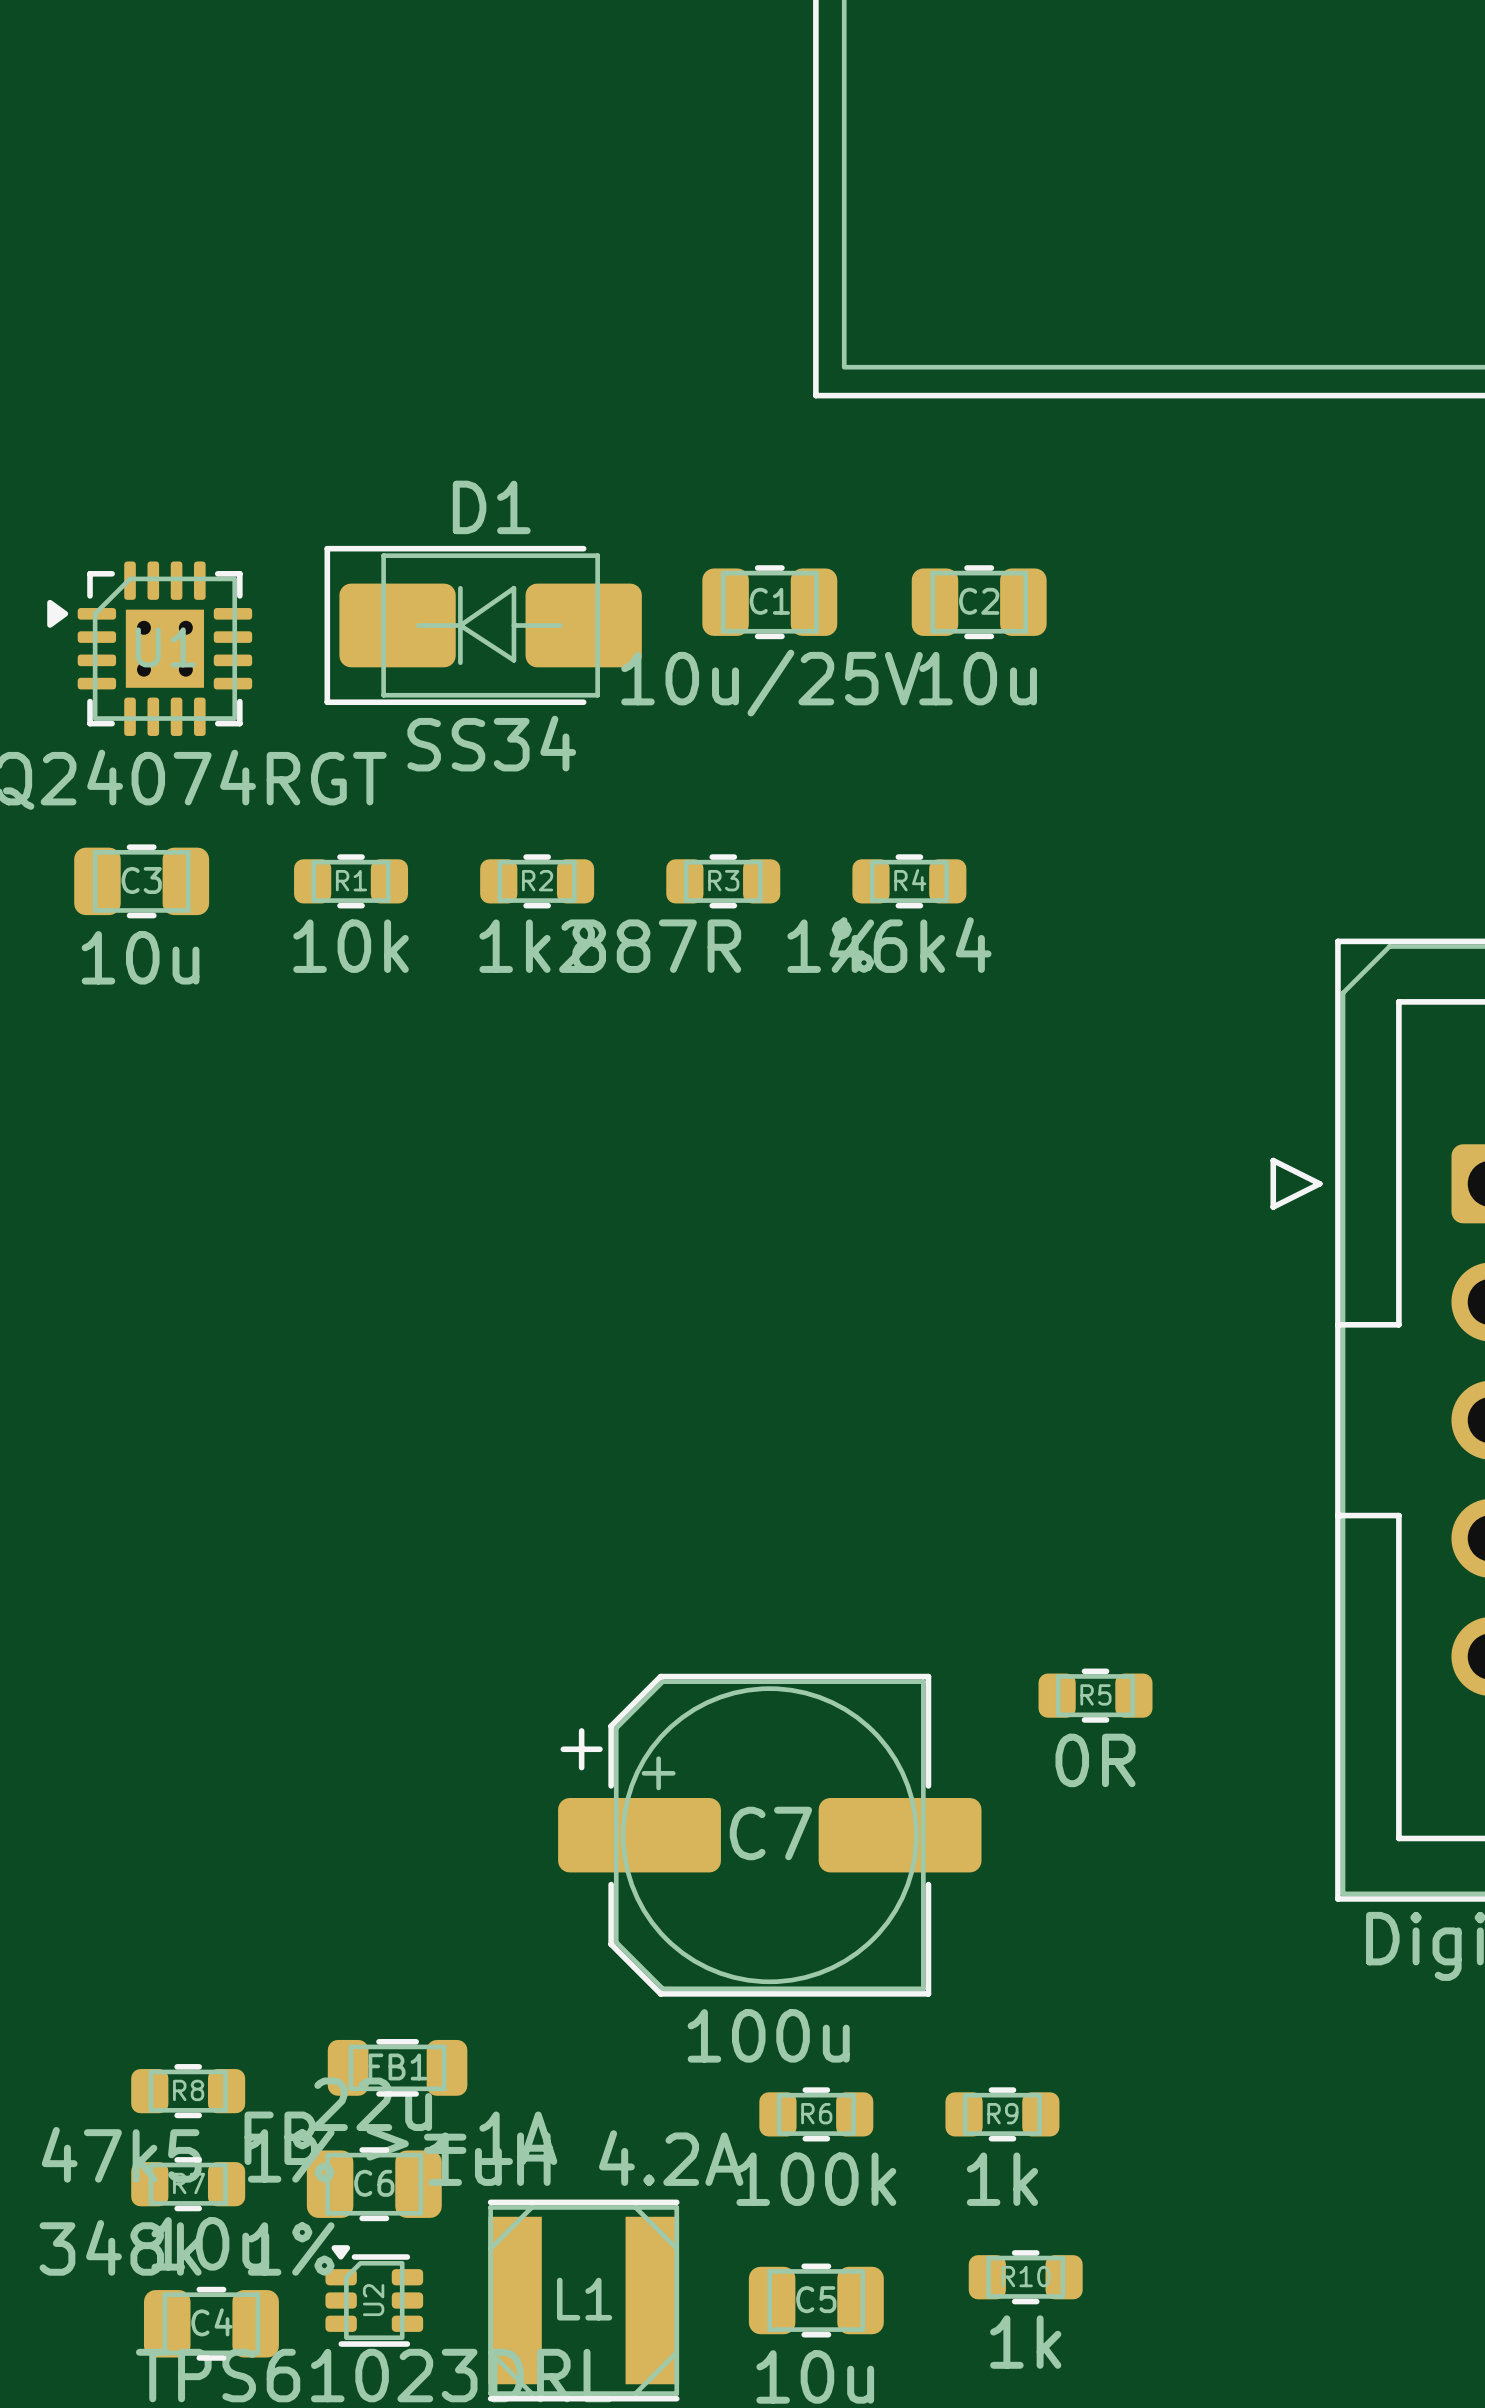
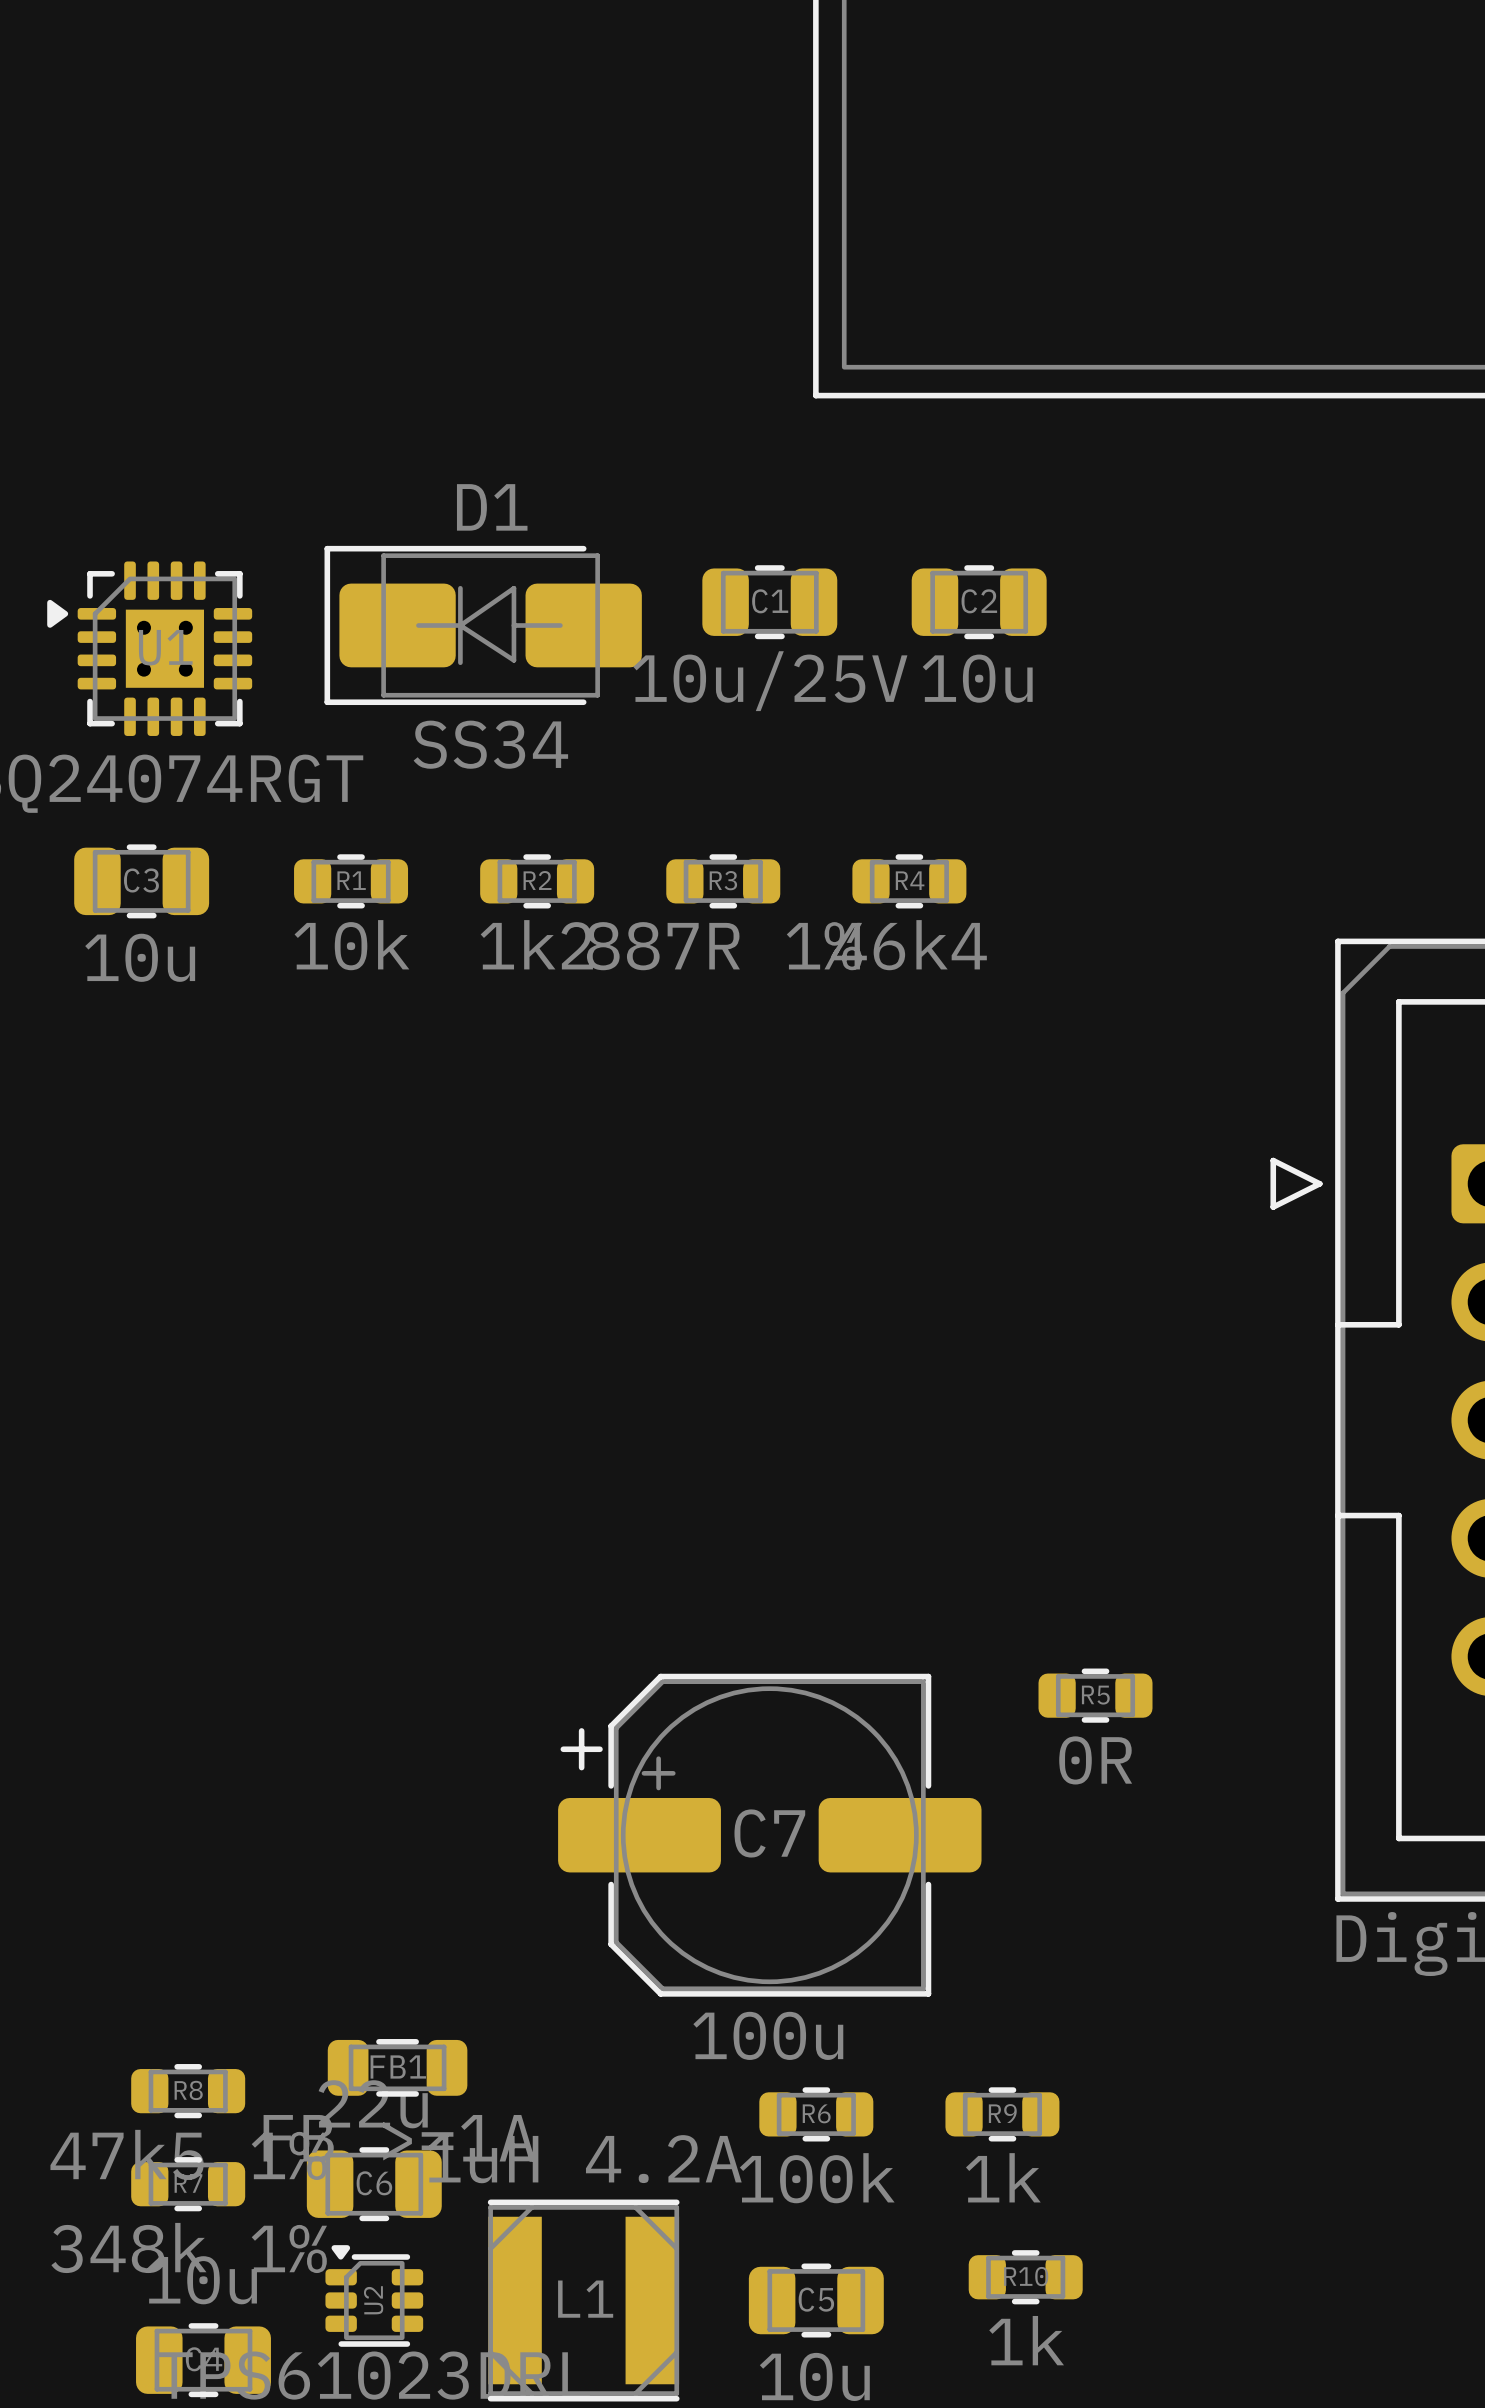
C4 position: (211, 2323) -> (203, 2360)

